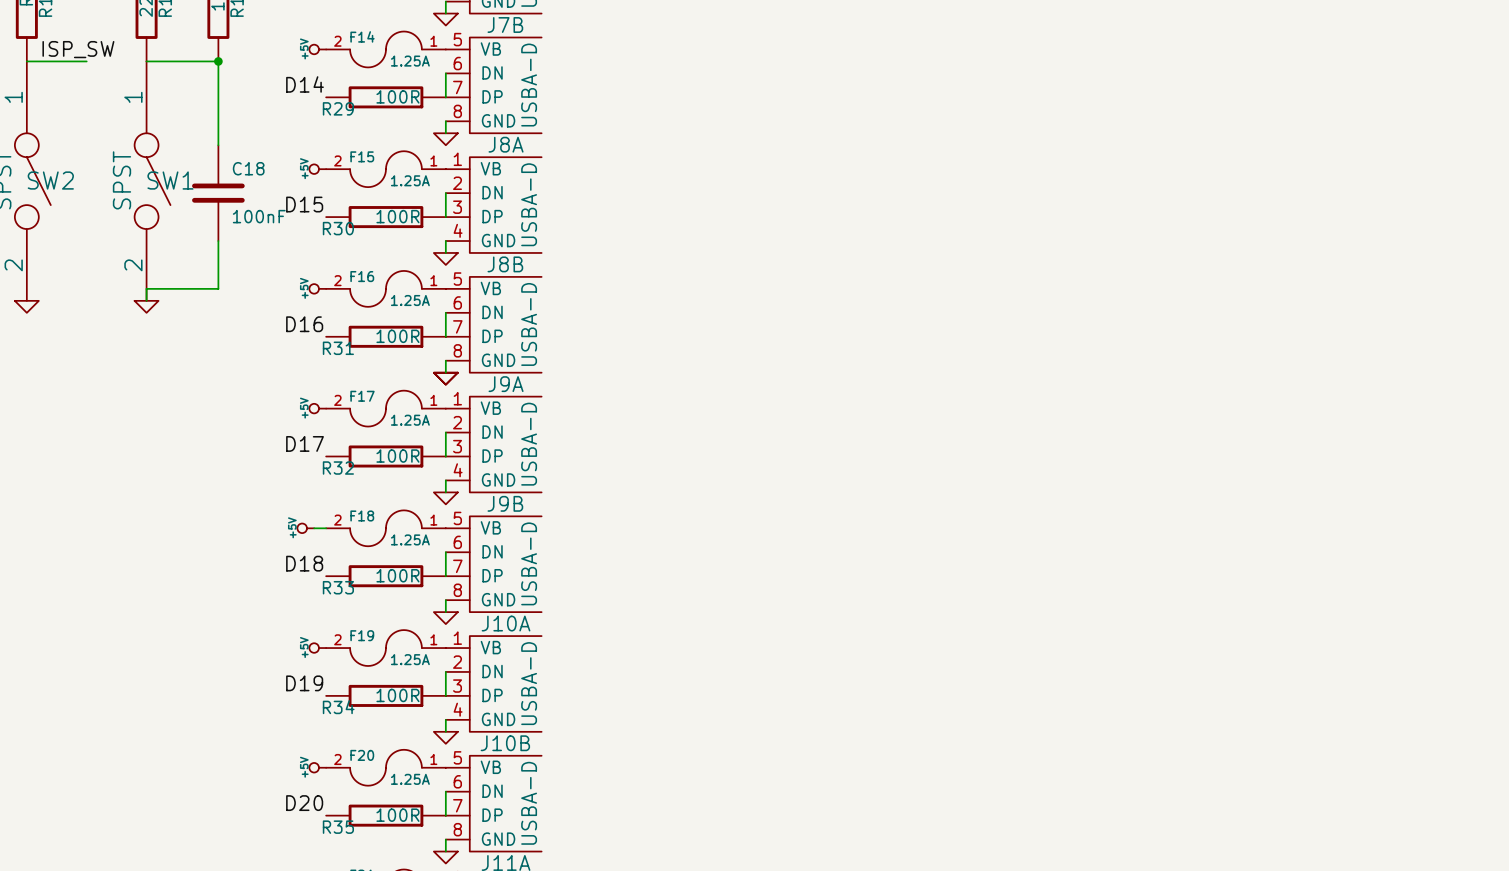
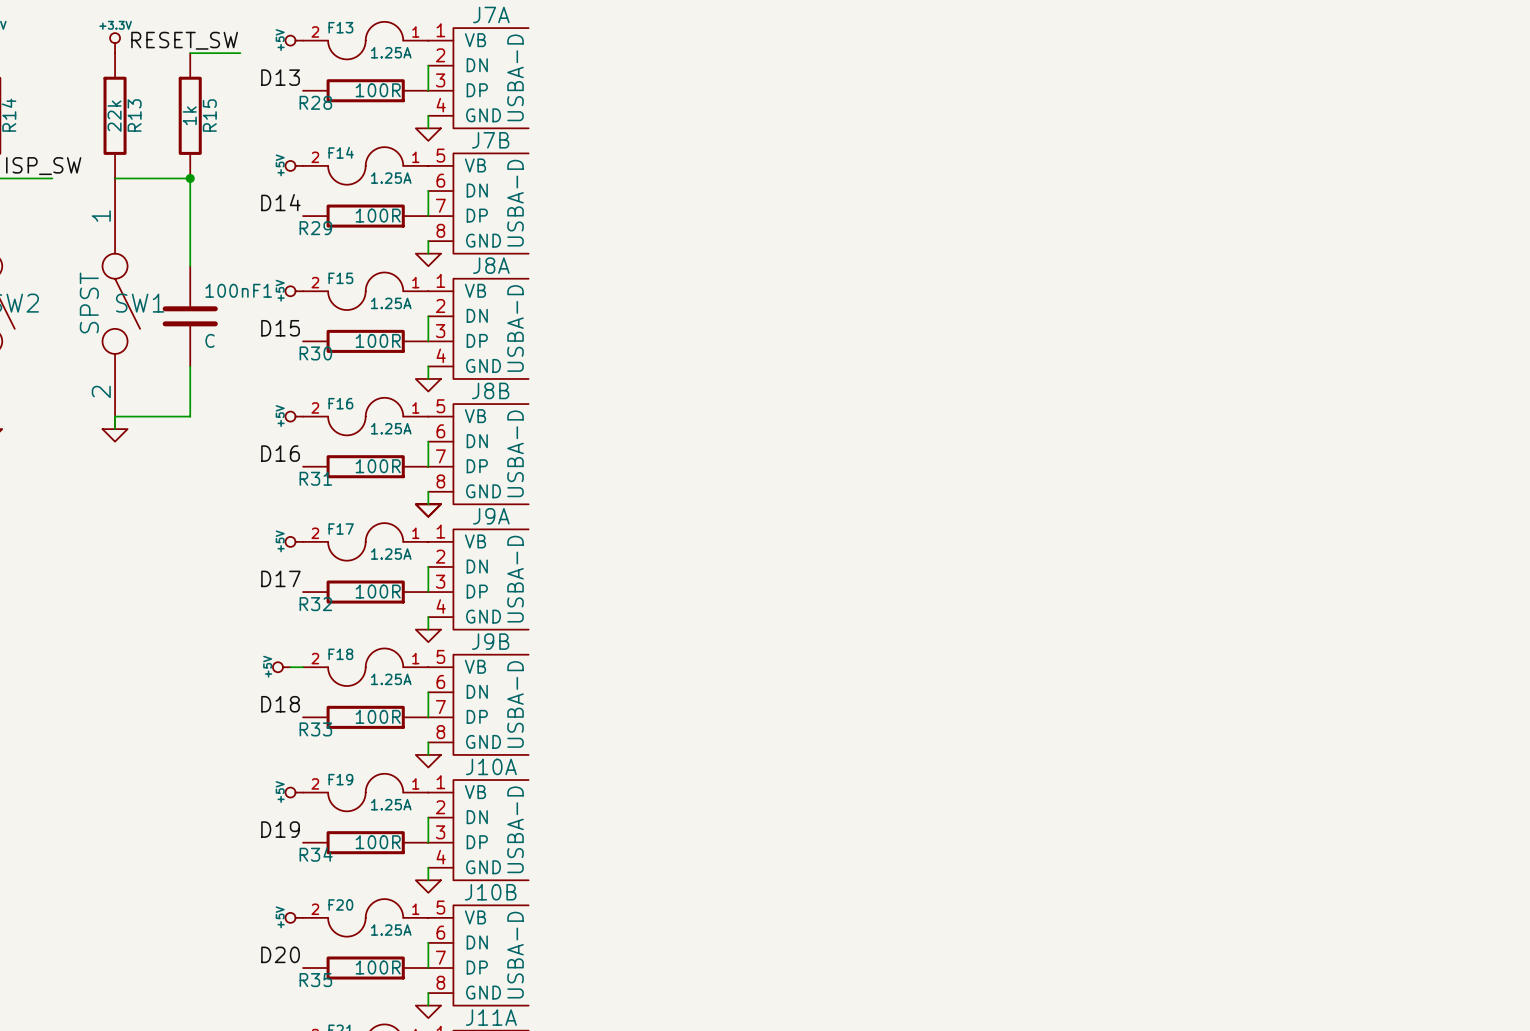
C18 name: C18 (248, 168) -> 100nF1 (238, 290)
C18 value: 100nF (259, 216) -> C (210, 340)

